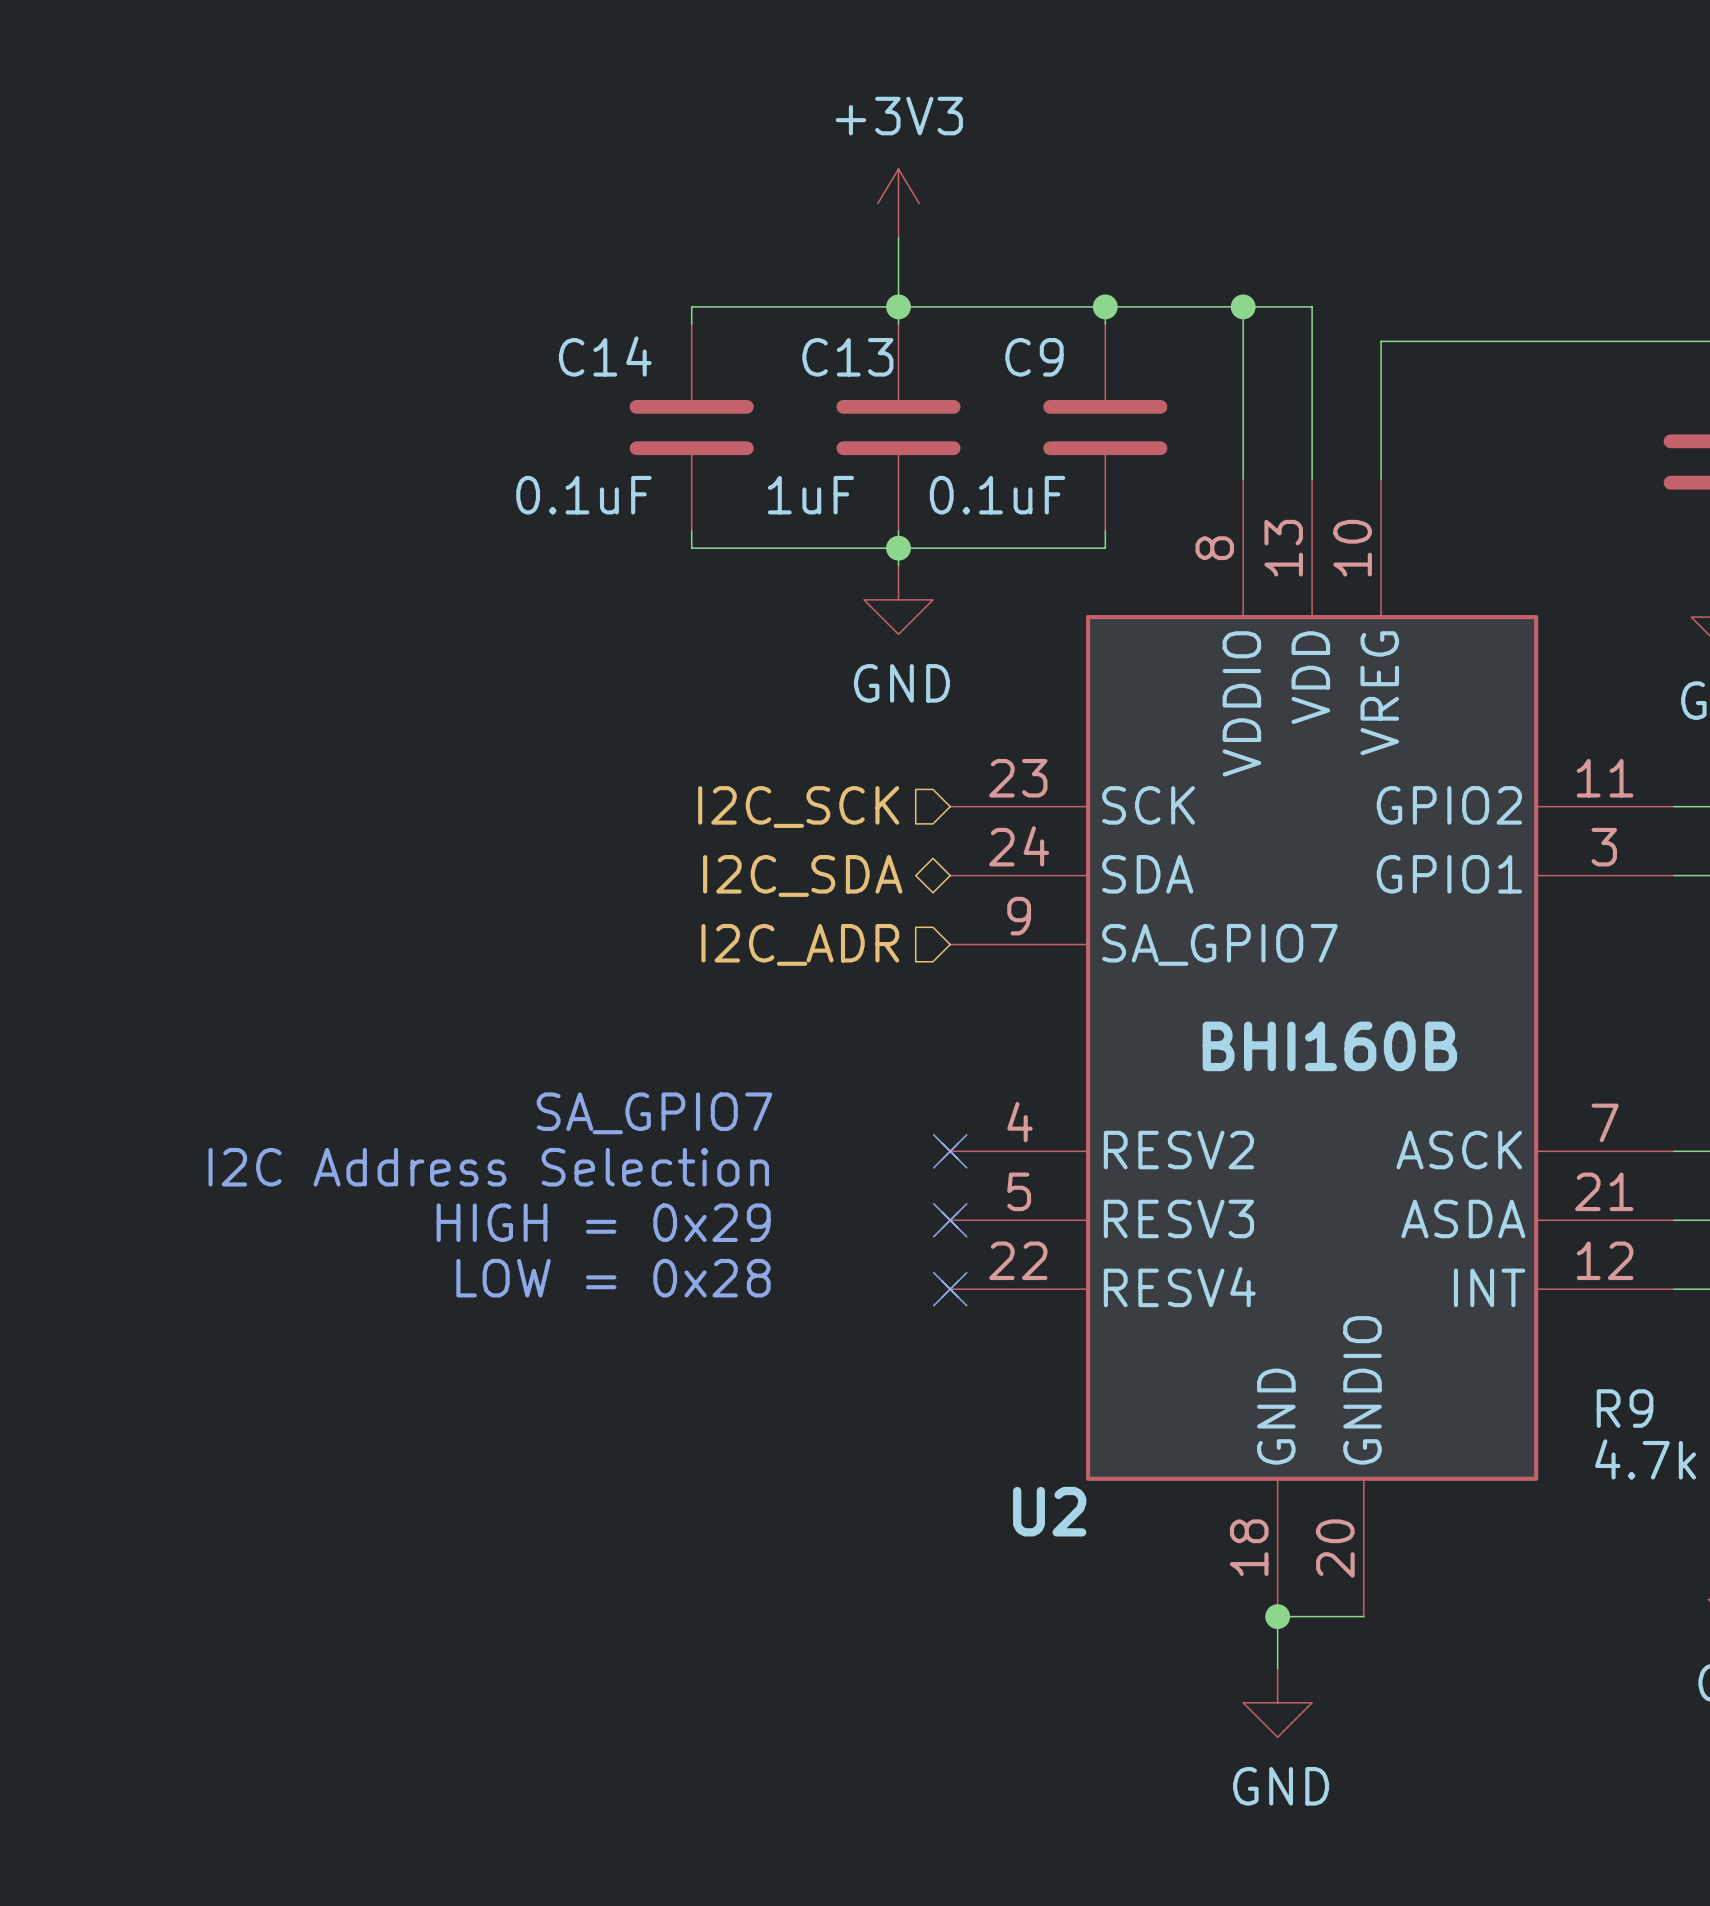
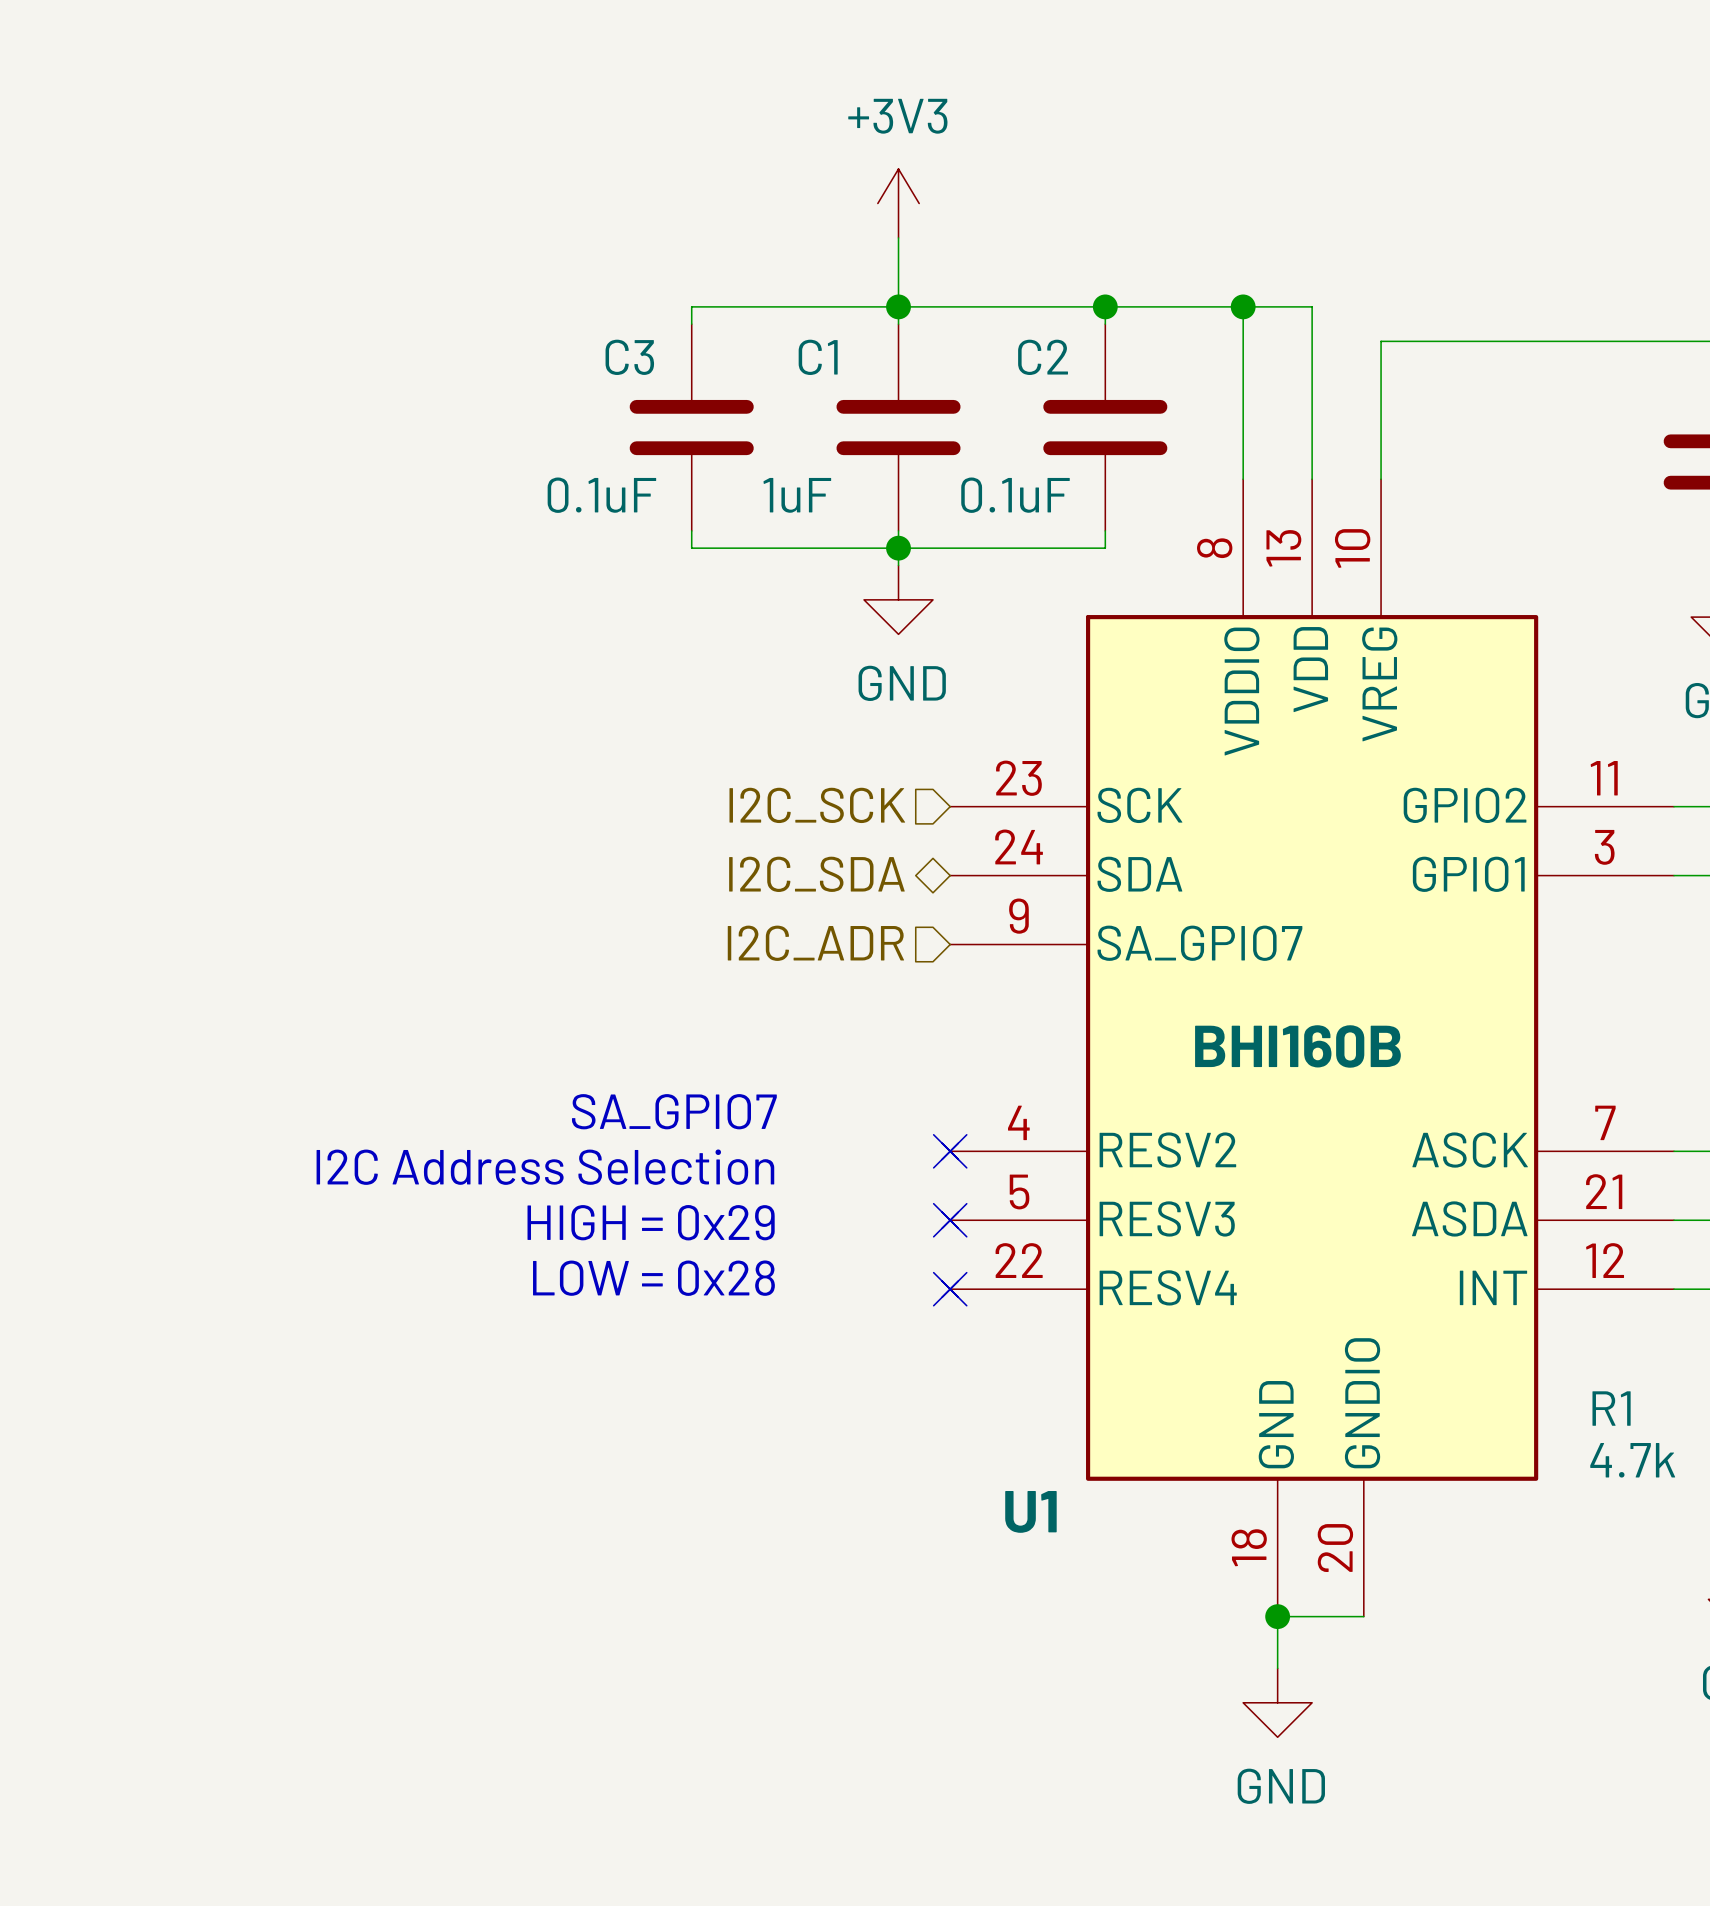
C14 name: C14 (605, 356) -> C3 (629, 357)
C13 name: C13 (847, 357) -> C1 (818, 357)
C9 name: C9 (1034, 357) -> C2 (1043, 357)
R9 name: R9 (1625, 1408) -> R1 (1611, 1408)
U2 name: U2 (1049, 1511) -> U1 (1030, 1511)

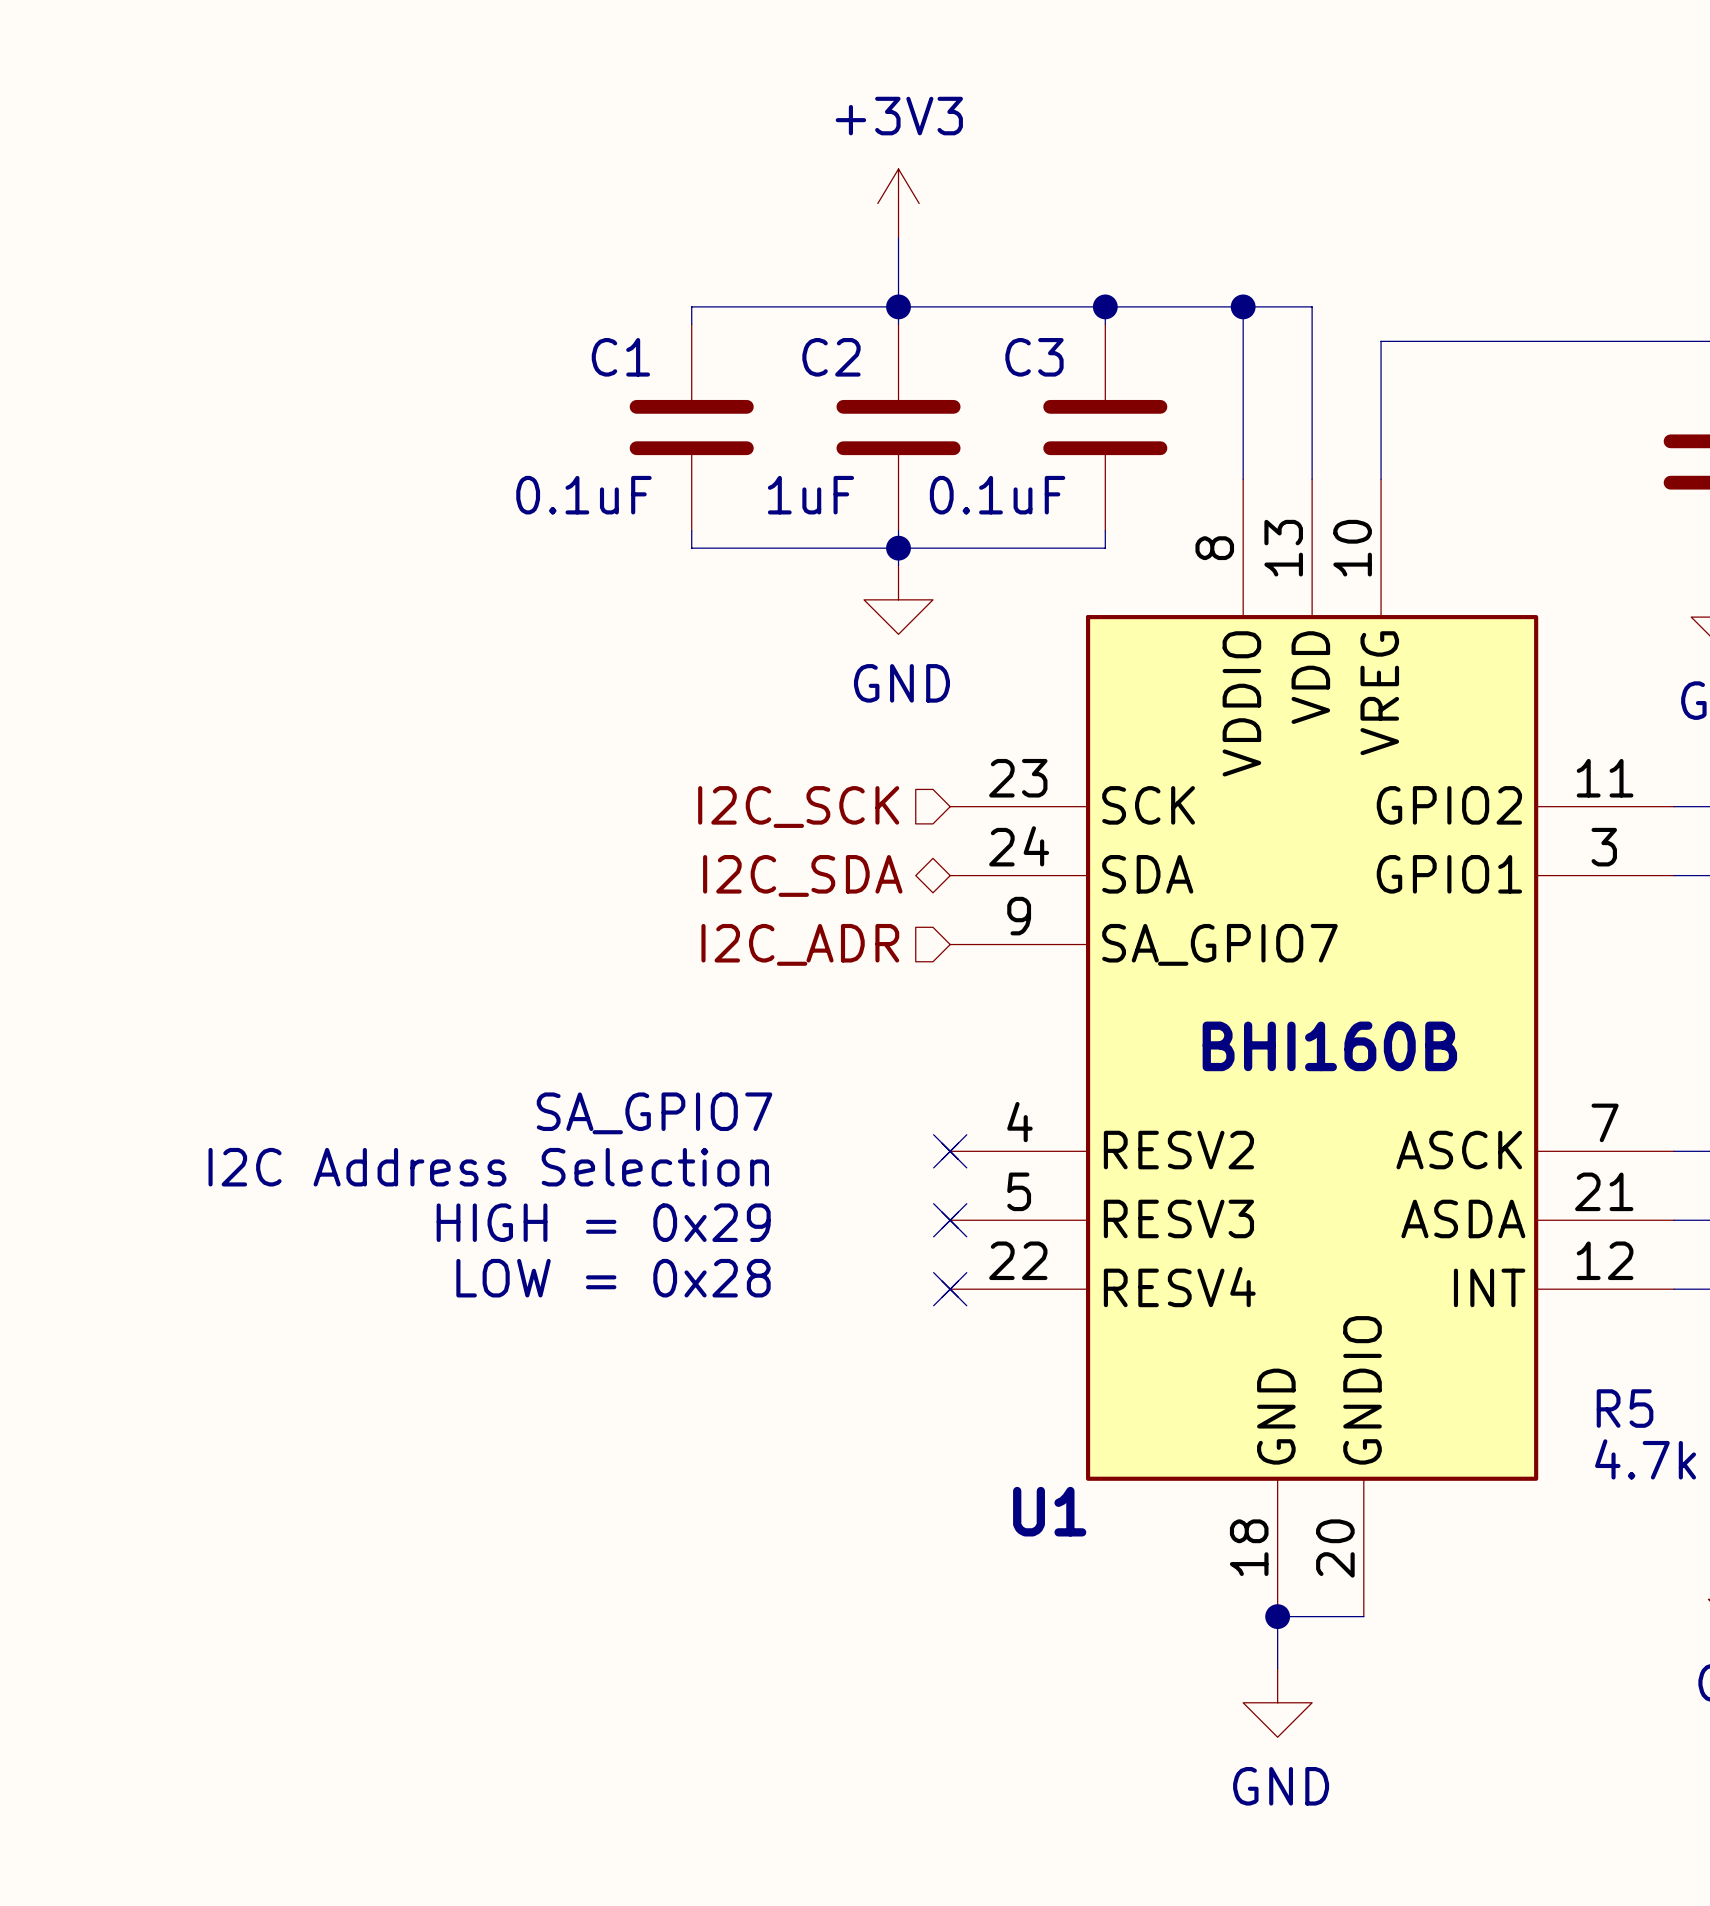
C3 name: C3 (629, 357) -> C1 (620, 357)
C1 name: C1 (818, 357) -> C2 (831, 357)
C2 name: C2 (1043, 357) -> C3 (1034, 357)
R1 name: R1 (1611, 1408) -> R5 (1625, 1408)

